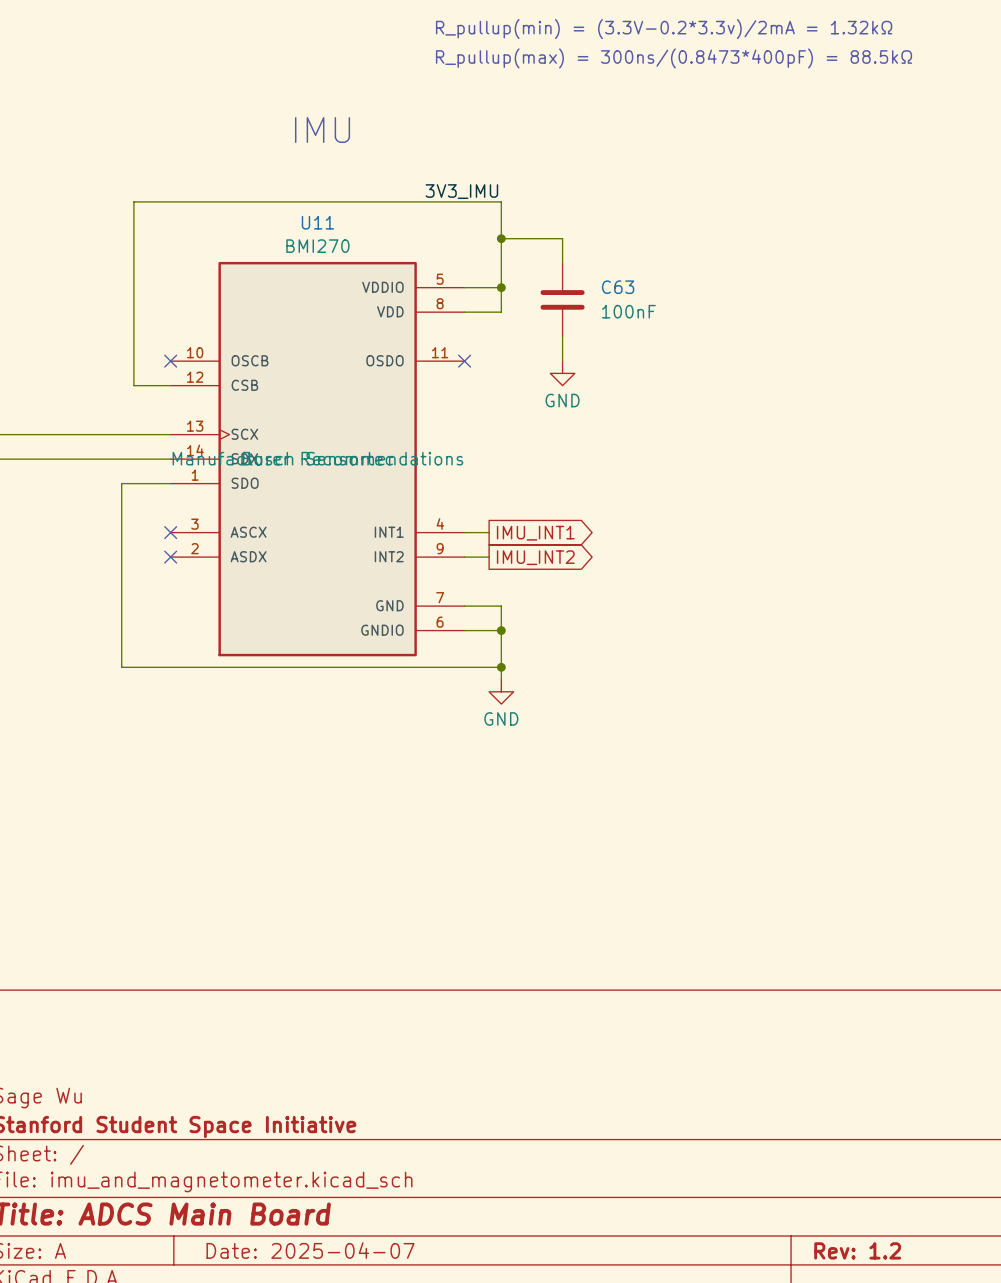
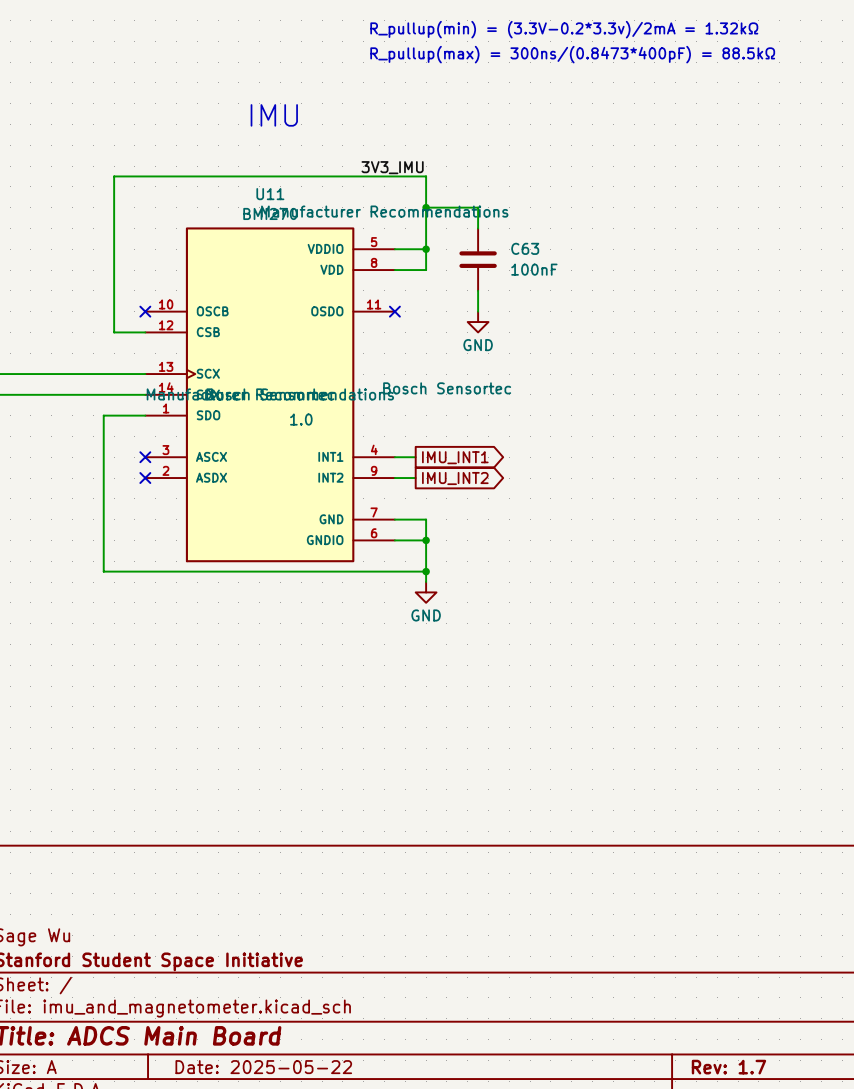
U11 text: none -> Manufacturer Recommendations (384, 211)
U11 text: none -> Bosch Sensortec (447, 388)
U11 text: none -> 1.0 (301, 419)
title block: Date: 2025-04-07 (310, 1250) -> Date: 2025-05-22 (263, 1067)
title block: Rev: 1.2 (857, 1250) -> Rev: 1.7 (728, 1067)

